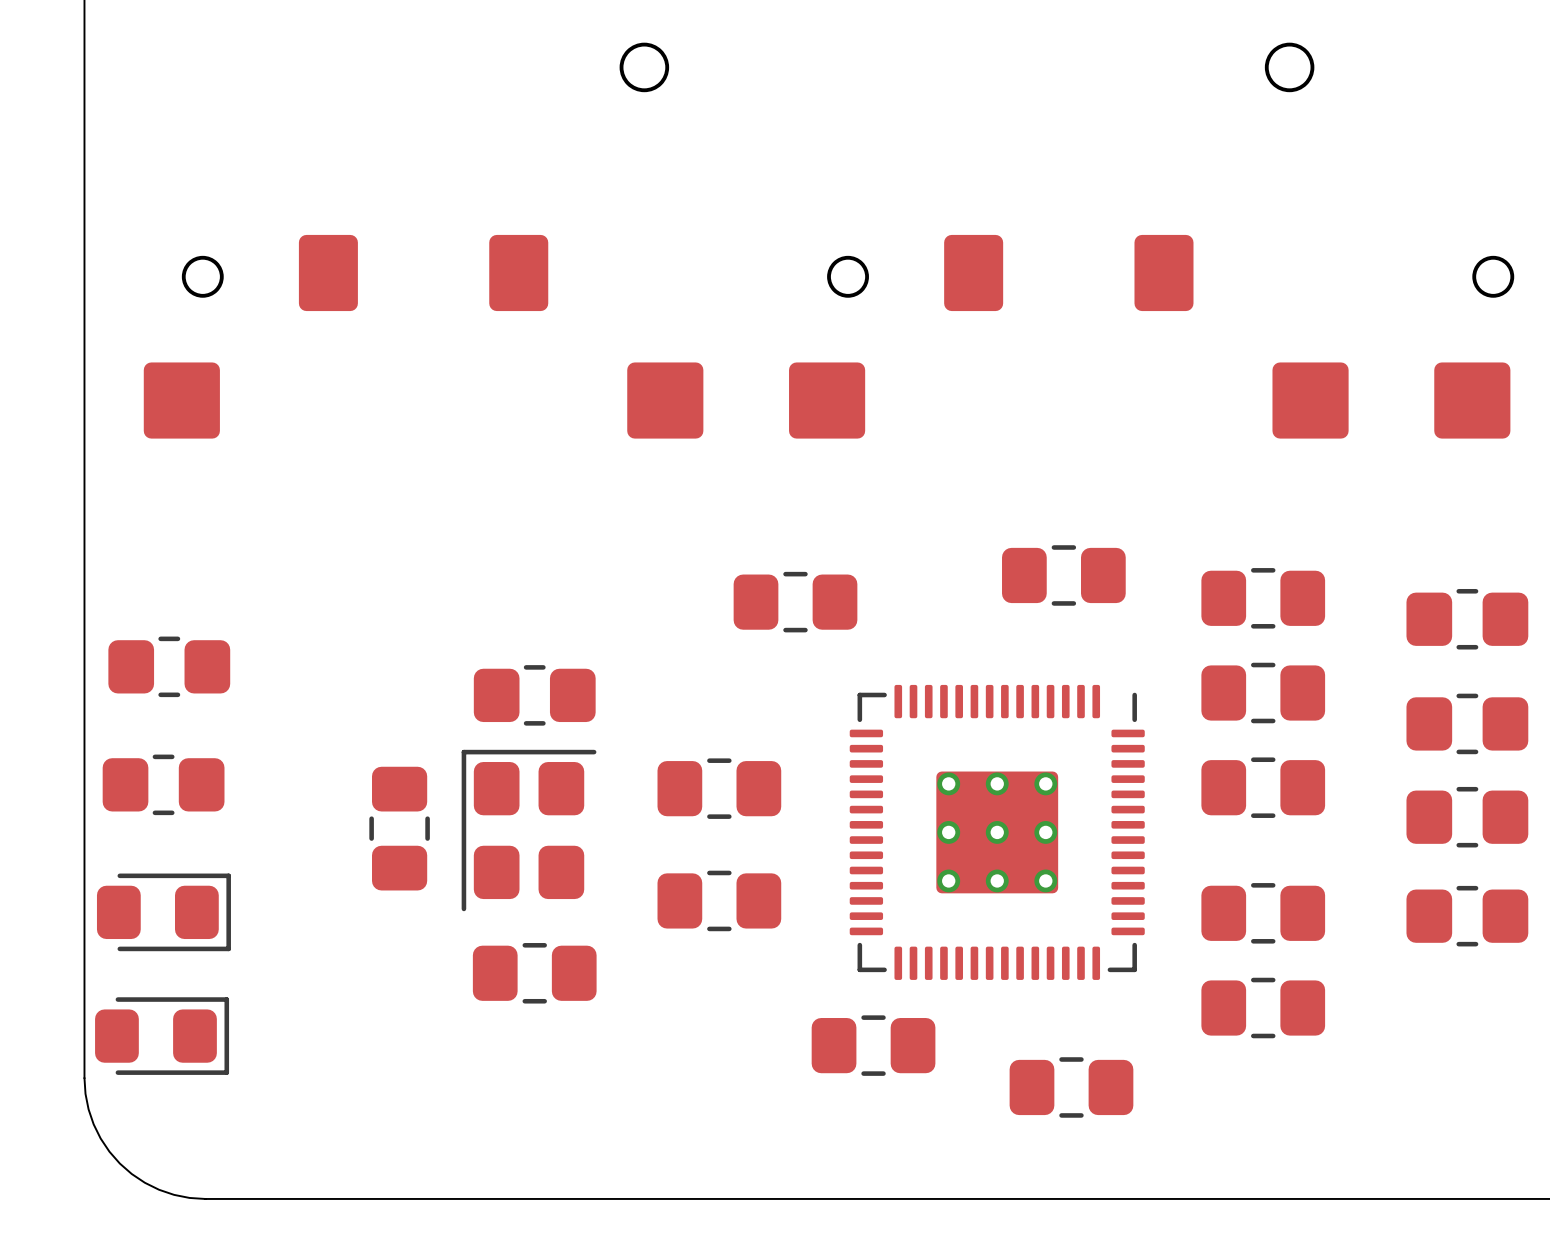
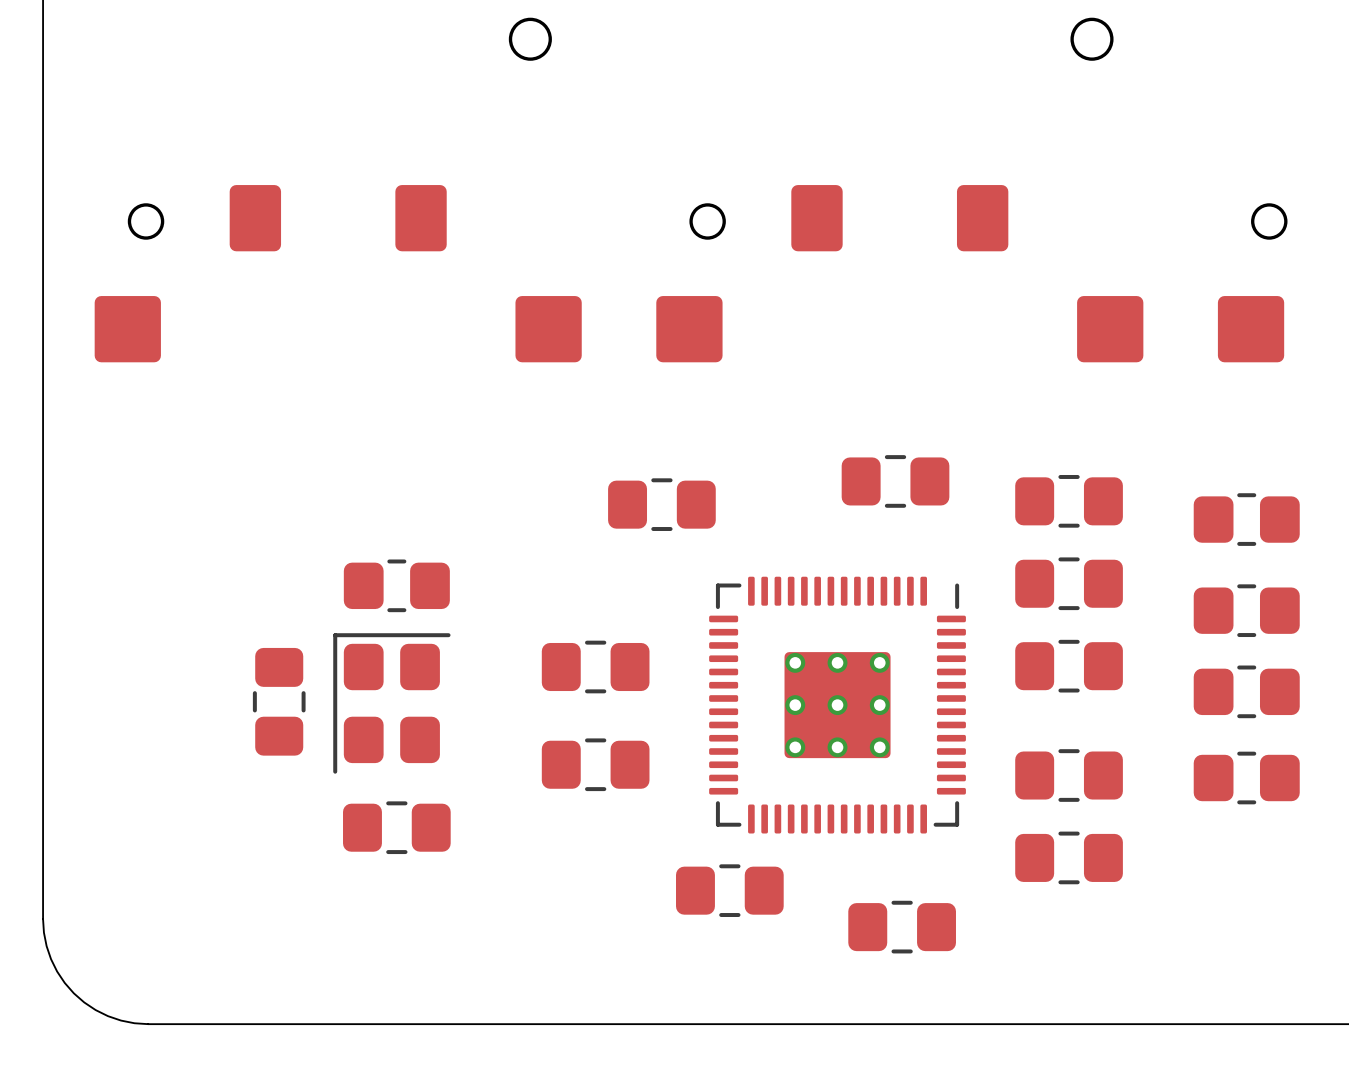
part: (169, 666) -> none
part position: (534, 695) -> (396, 585)
part: (163, 784) -> none
part position: (399, 828) -> (279, 701)
part position: (529, 830) -> (391, 703)
part: (163, 912) -> none
part position: (534, 973) -> (396, 827)
part: (162, 1036) -> none

